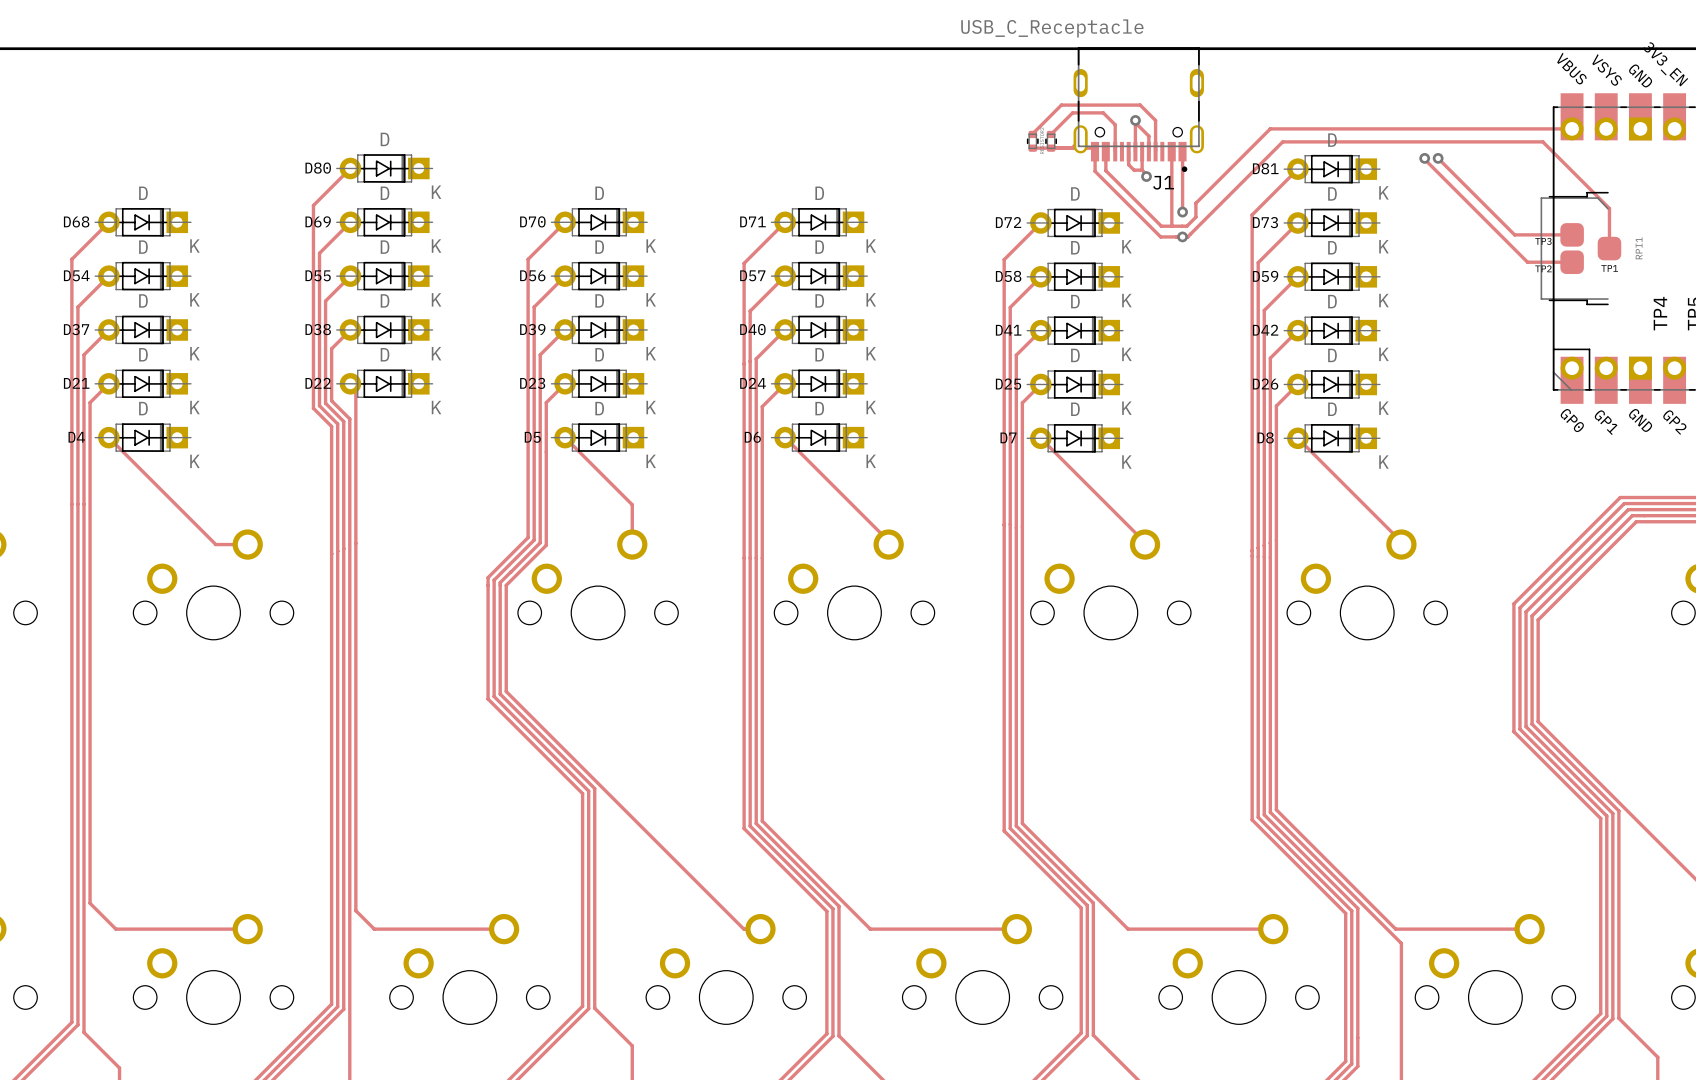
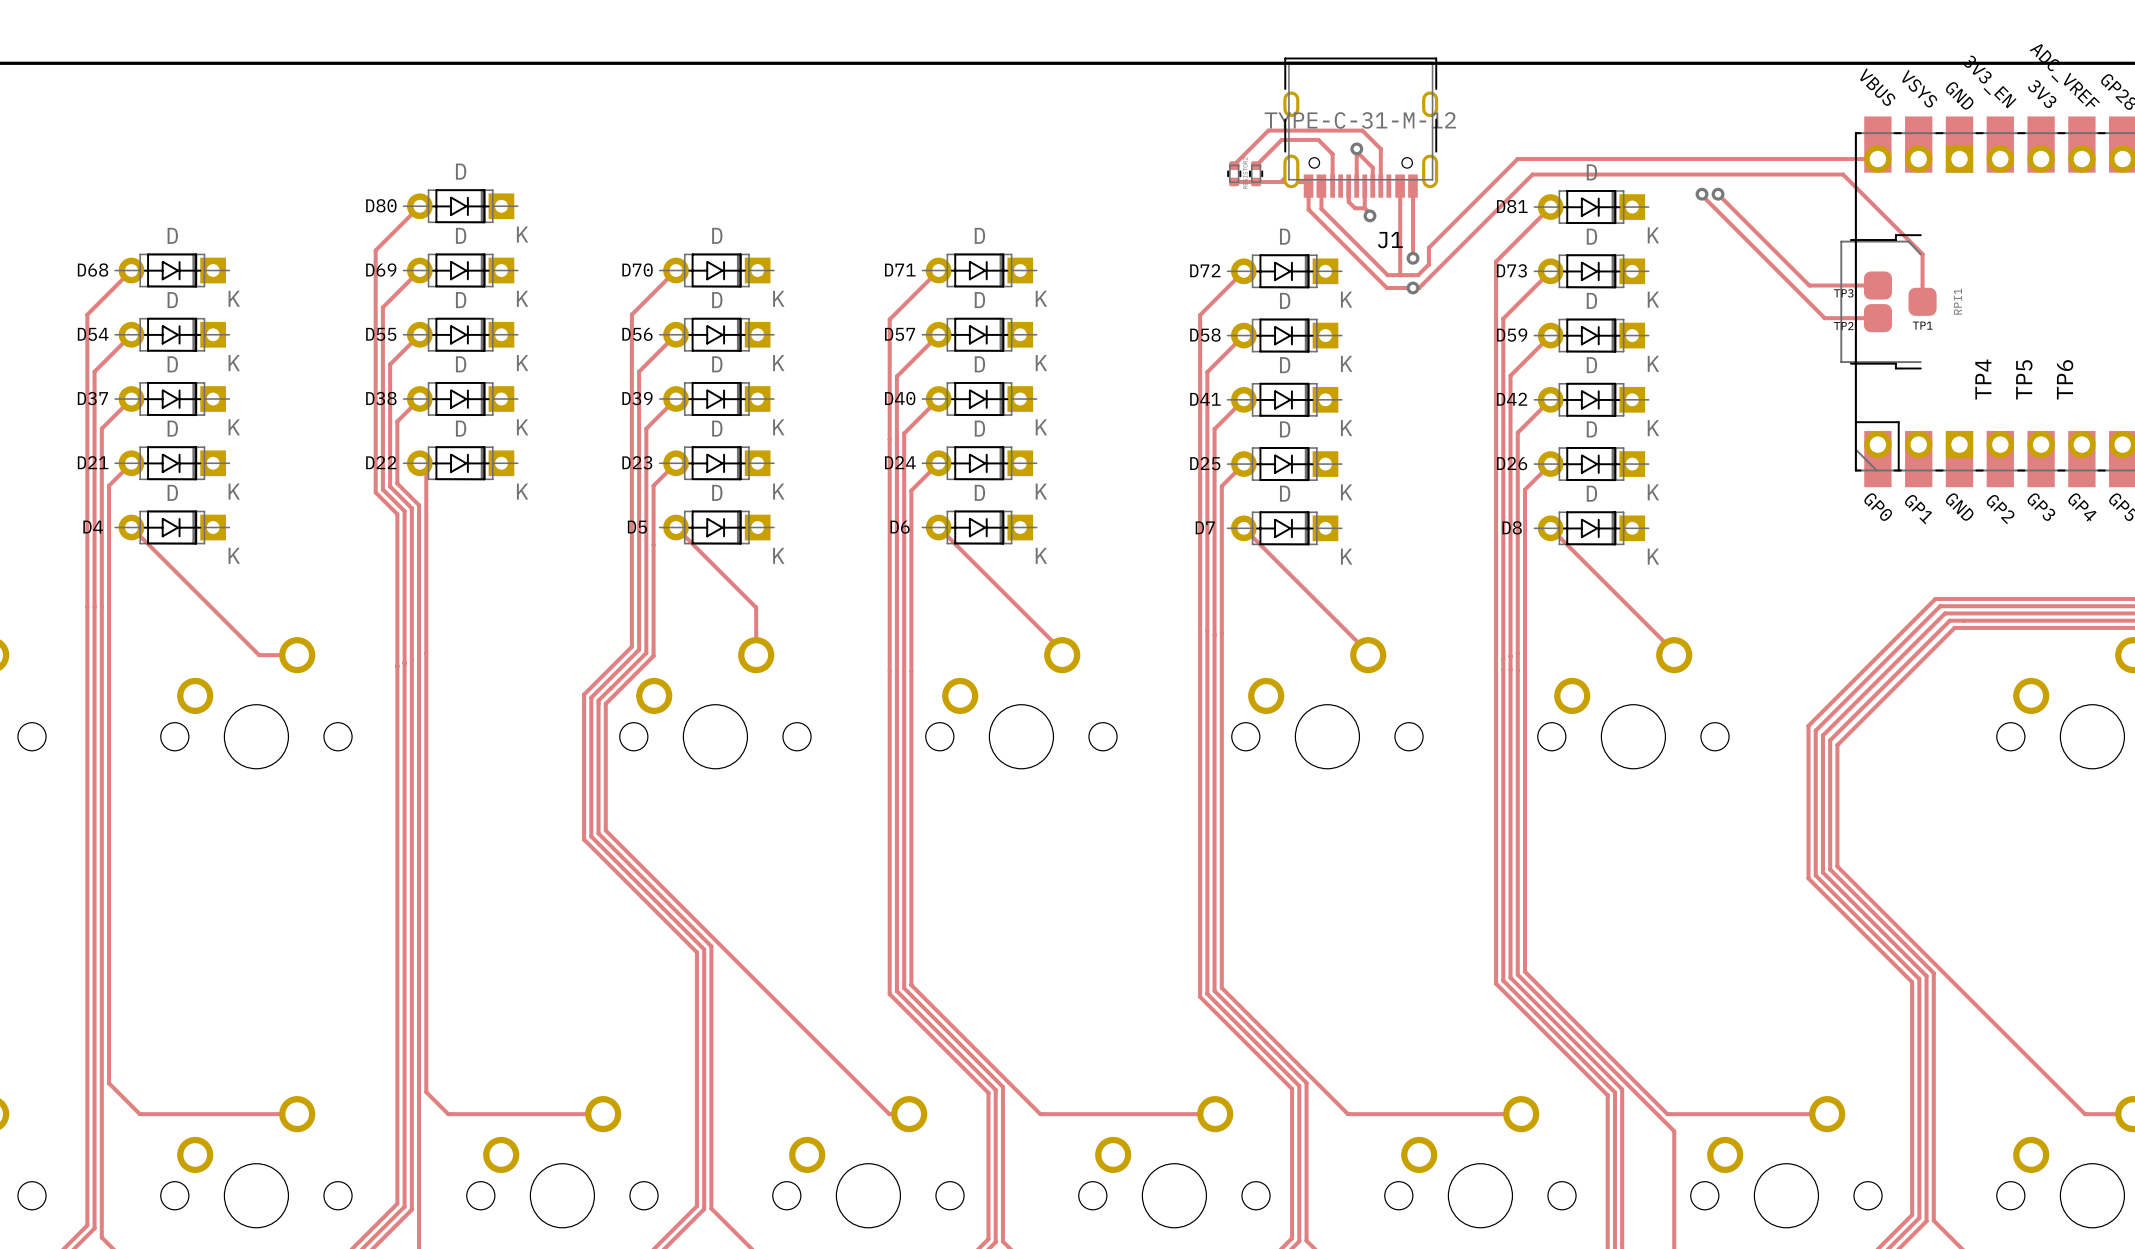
J1 value: USB_C_Receptacle (1052, 28) -> TYPE-C-31-M-12 (1360, 120)
J1 footprint: [1073, 47, 1204, 172] -> [1283, 57, 1439, 198]

